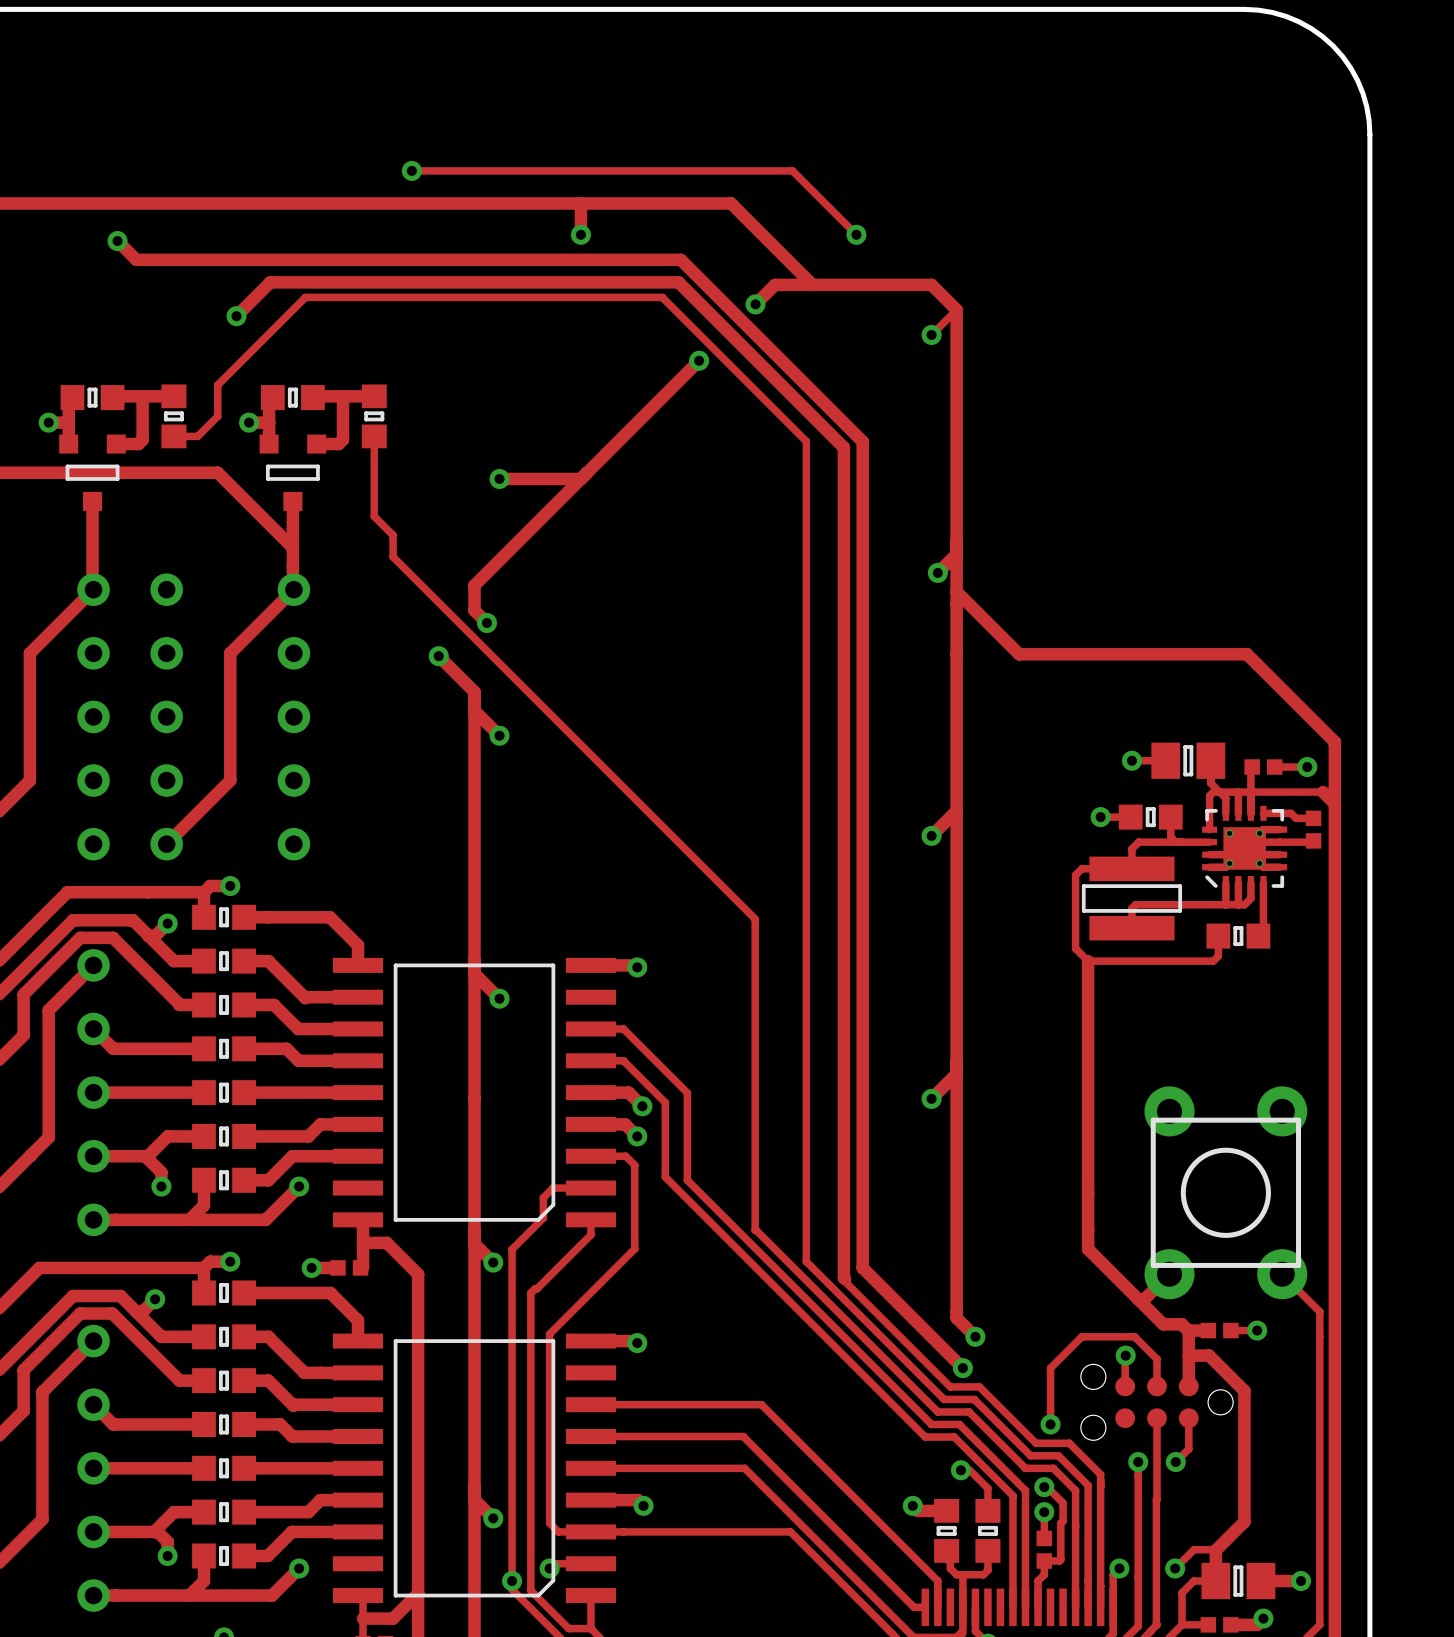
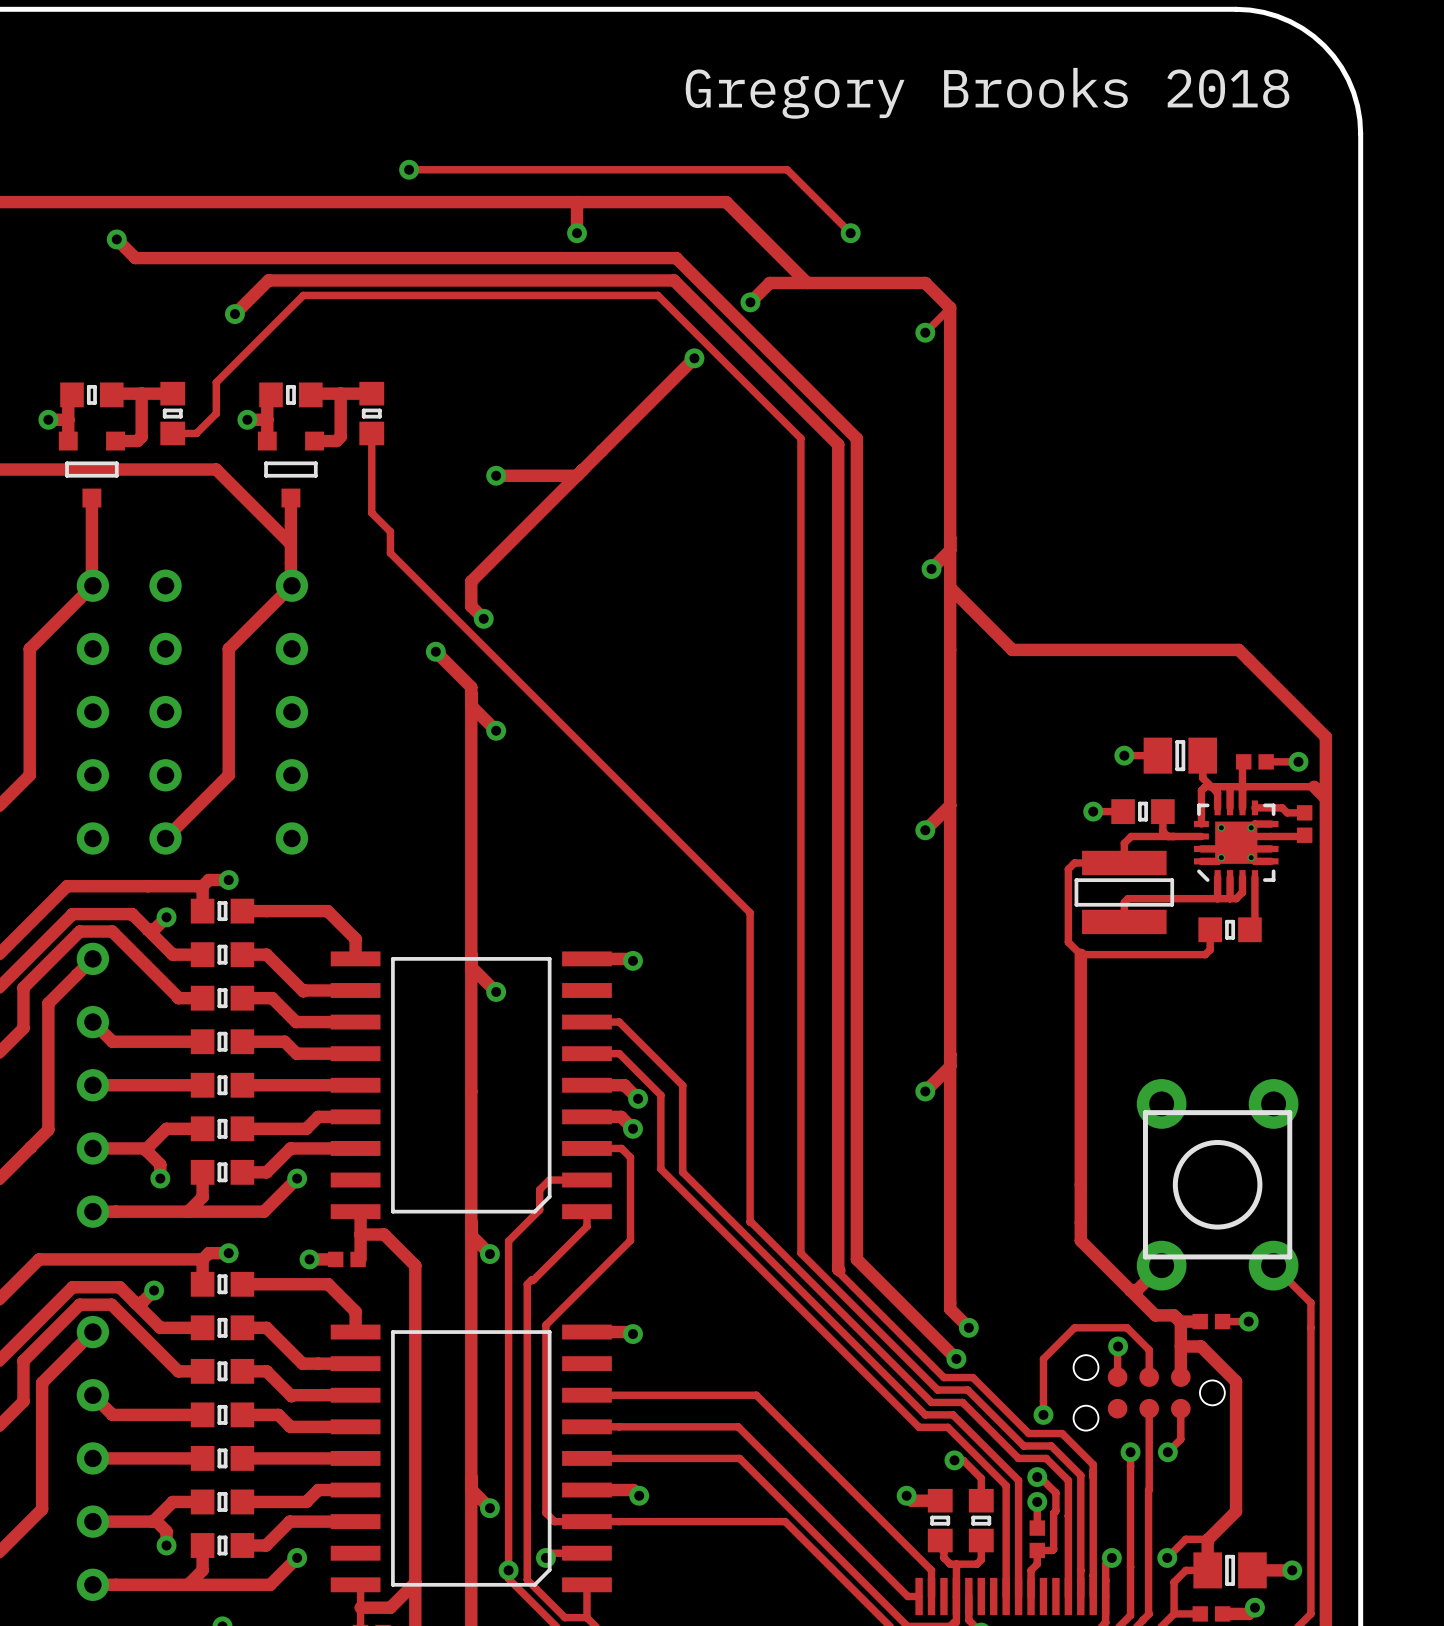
text: none -> Gregory Brooks 2018 (987, 93)

